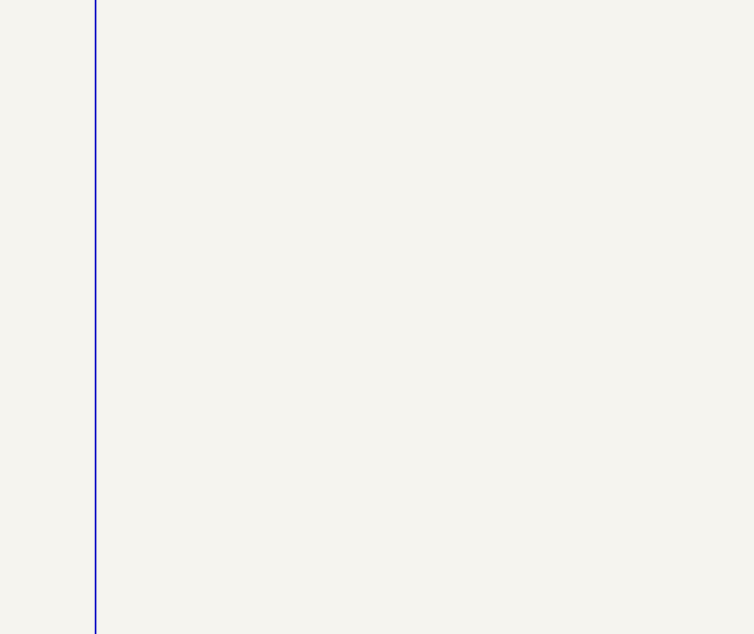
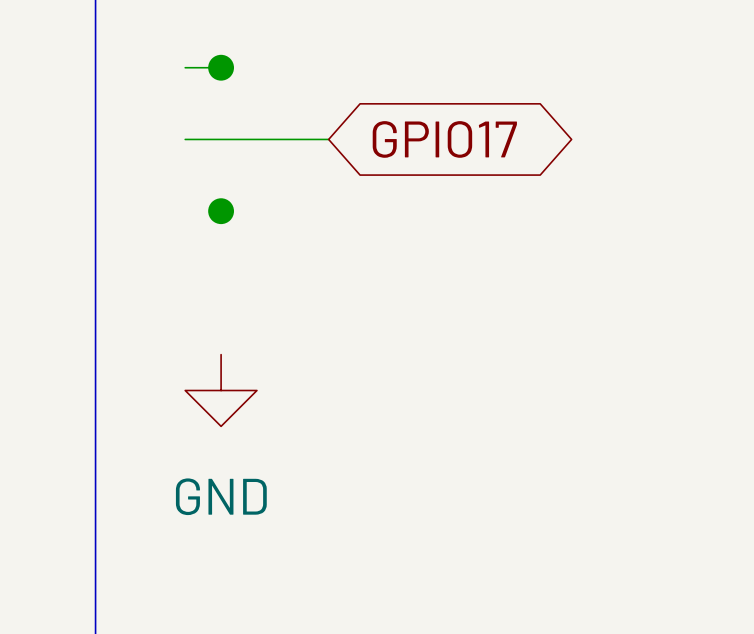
wire: none -> (185, 67) (221, 67)
junction: none -> (221, 67)
wire: none -> (185, 139) (328, 139)
global label: none -> GPIO17 (444, 139)
junction: none -> (221, 211)
power symbol: none -> GND (221, 390)

